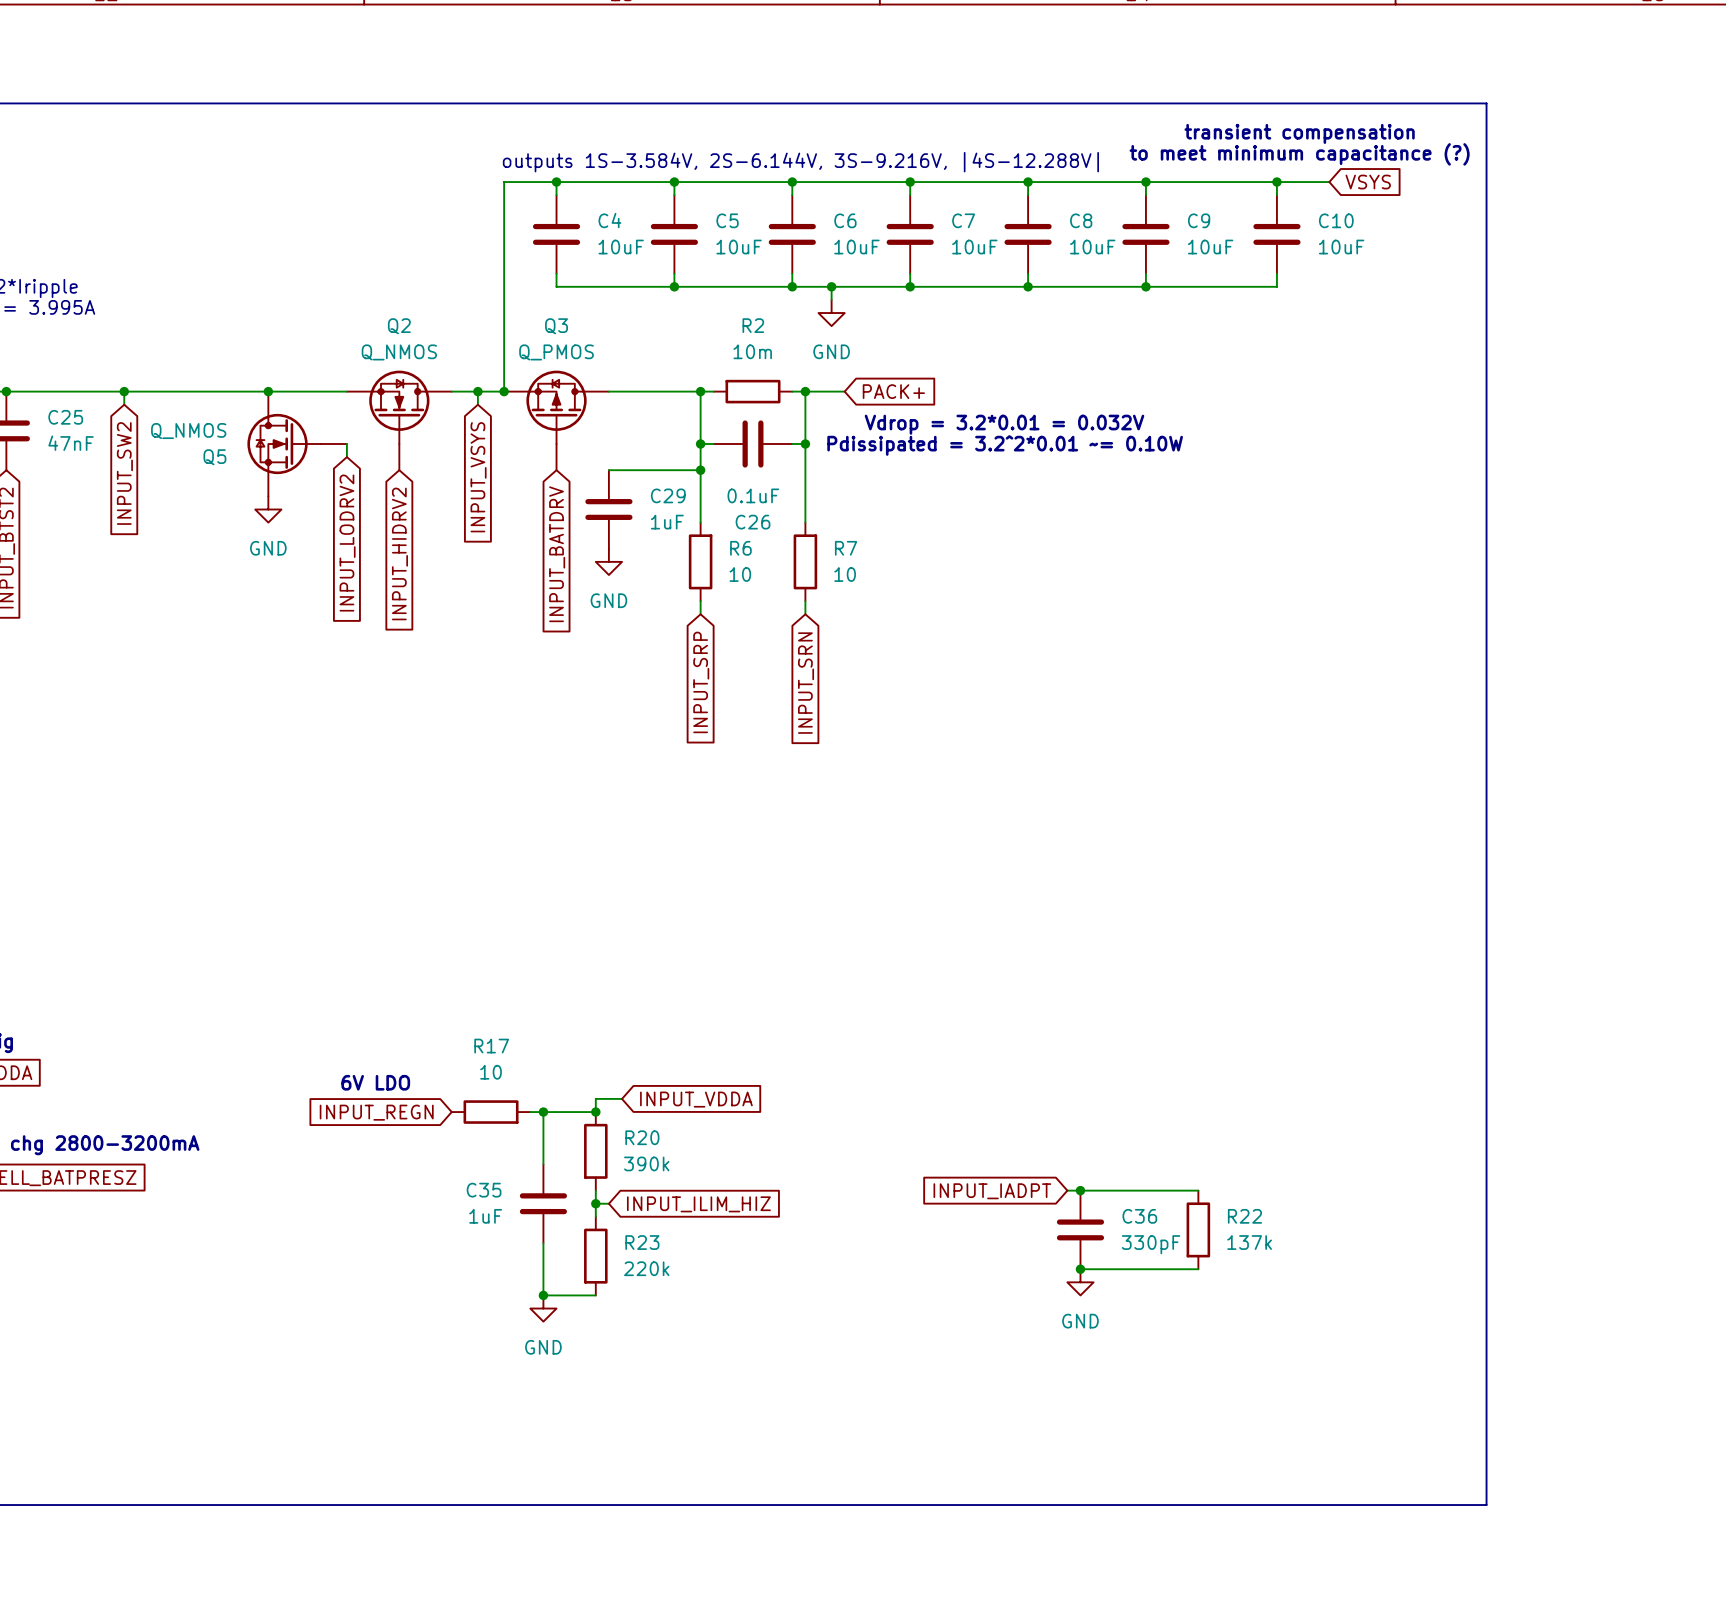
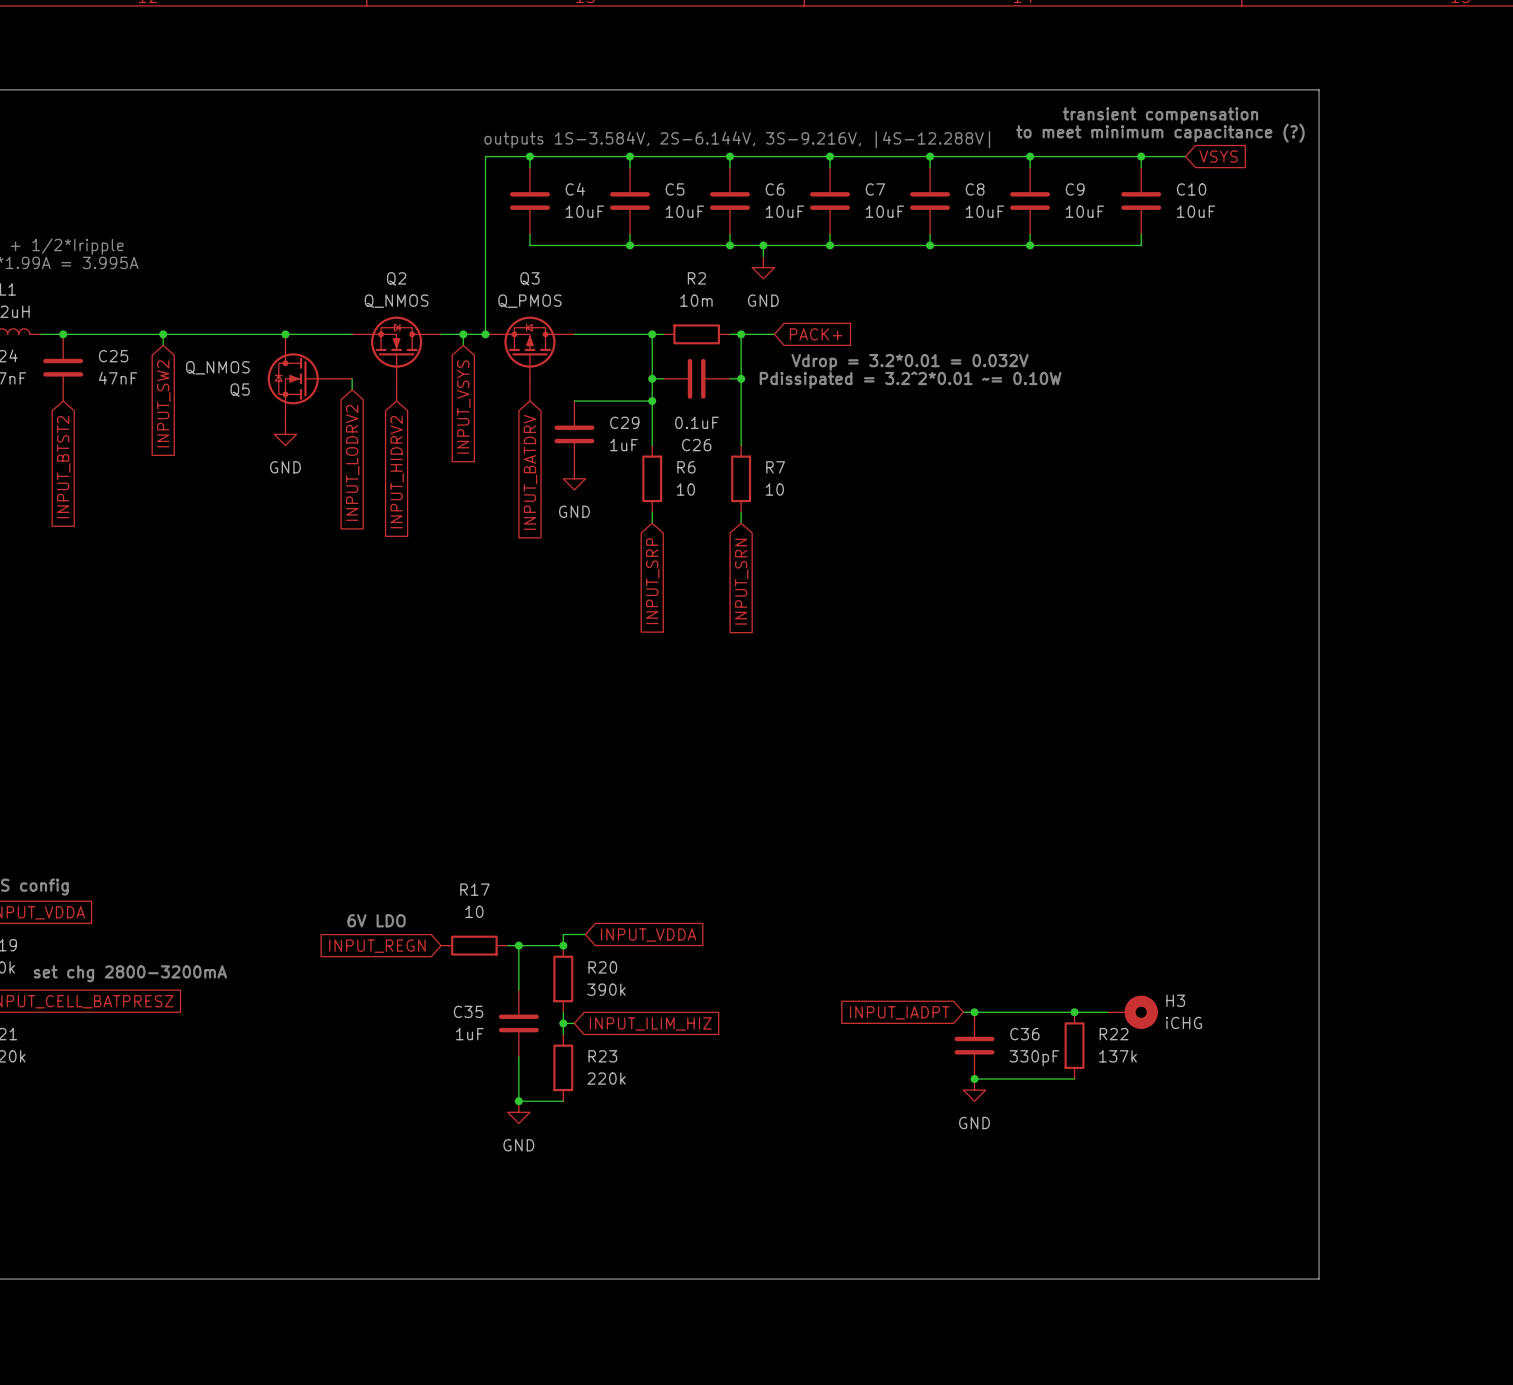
wire: none -> (1074, 1012) (1107, 1012)
junction: none -> (1074, 1012)
H3: none -> iCHG (1132, 1012)

